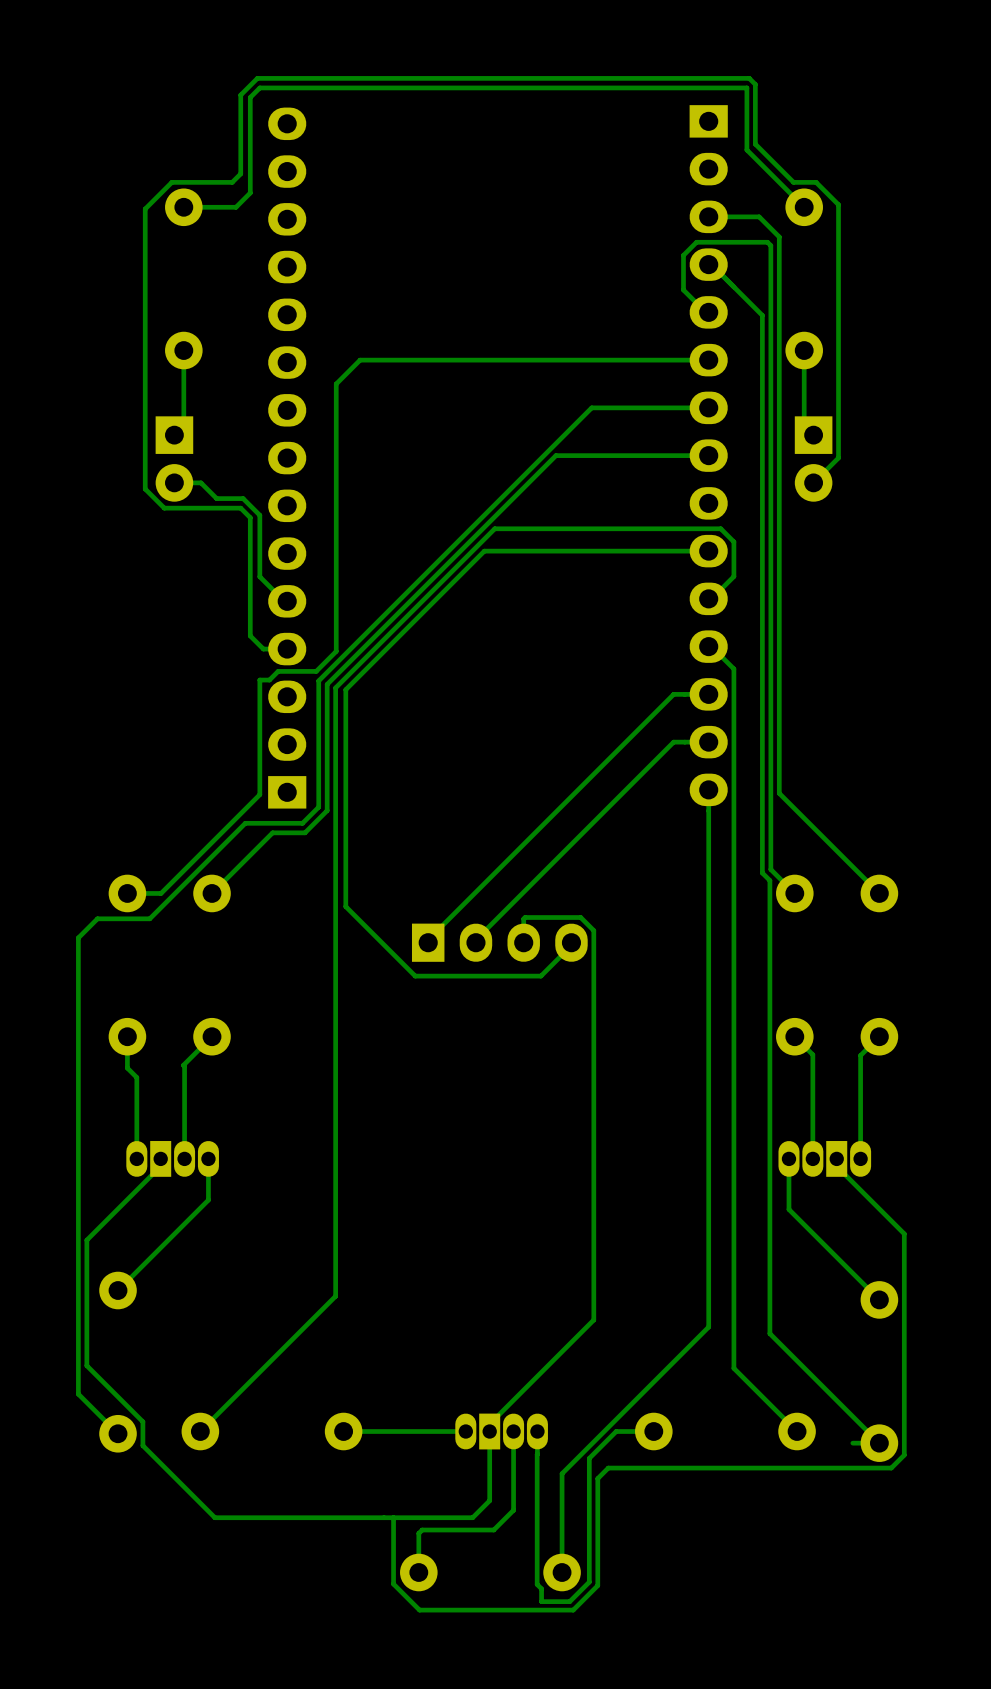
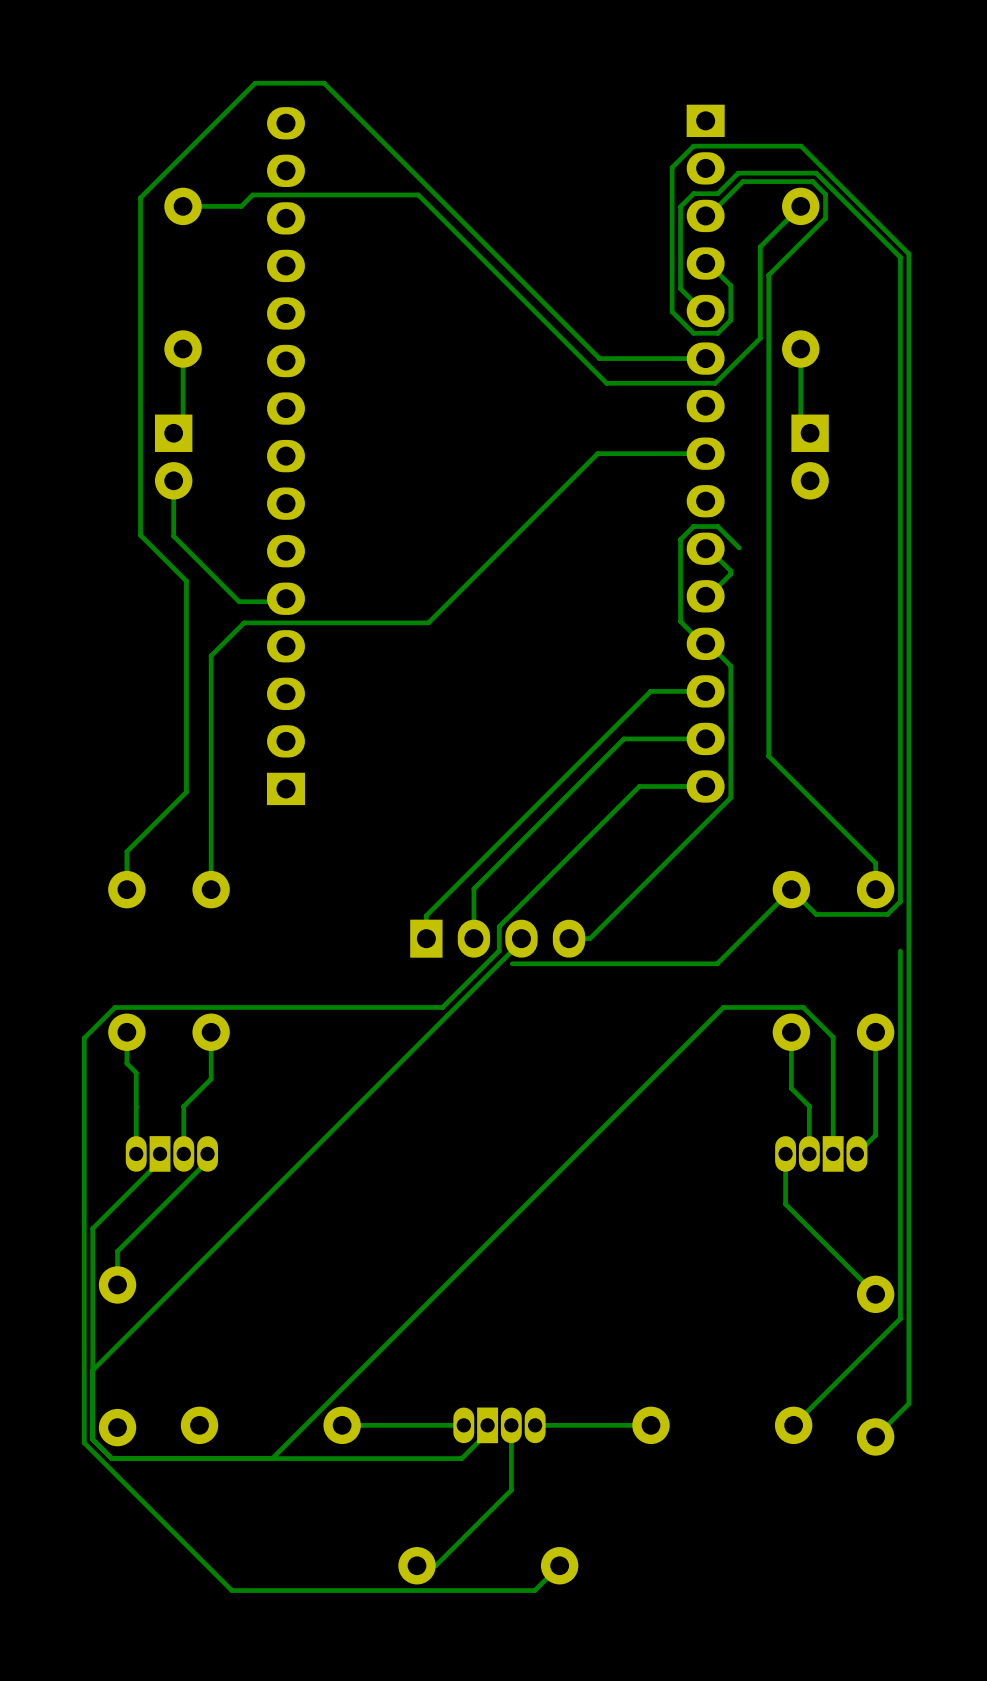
track: (793, 182) (755, 144) (755, 84) (749, 78) (257, 78) (240, 95) (240, 173) (232, 182) (171, 182) (145, 209) (145, 489) (164, 508) (240, 508) (250, 517) (250, 635) (263, 649) (287, 649) -> (790, 181) (742, 181) (708, 215)
track: (829, 195) (838, 204) (838, 457) (813, 482) -> none
track: (804, 207) (746, 149) (746, 87) (259, 87) (250, 97) (250, 192) (236, 207) -> (800, 206) (760, 246) (760, 338) (715, 383) (606, 383) (418, 194) (252, 194) (241, 206) (234, 206)
track: (711, 216) (759, 216) (779, 236) (779, 793) (879, 893) -> (825, 194) (825, 218) (768, 275) (768, 756) (875, 863) (875, 889)
track: (683, 255) (696, 242) (767, 242) (770, 245) (770, 869) (794, 893) -> (680, 254) (680, 206) (693, 193) (717, 193) (738, 173) (816, 173) (900, 257) (900, 901) (887, 914) (816, 914) (791, 889) (717, 963) (512, 963)
track: (733, 286) (762, 315) (762, 873) (769, 880) (769, 1333) (879, 1443) (852, 1443) -> (730, 285) (730, 320) (717, 333) (693, 333) (672, 311) (672, 167) (693, 146) (801, 146) (908, 253) (908, 1403) (875, 1436)
track: (602, 360) (360, 360) (336, 384) (336, 651) (316, 671) (278, 671) (269, 680) (259, 680) (259, 794) (161, 893) (127, 893) -> (599, 358) (324, 83) (255, 83) (140, 197) (140, 535) (186, 581) (186, 792) (126, 851) (126, 889)
track: (708, 407) (591, 407) (318, 680) (318, 807) (302, 823) (245, 823) (149, 918) (97, 918) (78, 937) (78, 1394) (118, 1433) -> none
track: (600, 455) (555, 455) (327, 684) (327, 810) (304, 832) (272, 832) (212, 893) -> (597, 453) (428, 622) (244, 622) (211, 655) (211, 889)
track: (174, 482) (201, 482) (216, 498) (243, 498) (259, 515) (259, 576) (284, 601) (287, 601) -> (173, 480) (173, 536) (239, 601) (282, 601)
track: (696, 528) (494, 528) (335, 687) (335, 1296) (200, 1431) -> (693, 526) (680, 539) (680, 621) (702, 643)
track: (733, 541) (733, 573) -> (708, 548) (730, 571)
track: none -> (730, 539) (739, 547)
track: (708, 551) (484, 551) (345, 689) (345, 906) (415, 976) (540, 976) (571, 945) (571, 942) -> (730, 797) (589, 938) (569, 938)
track: (673, 694) (428, 939) -> (670, 691) (650, 691) (426, 915) (426, 935)
track: (673, 742) (475, 939) -> (670, 738) (623, 738) (473, 888) (473, 935)
track: (708, 789) (708, 1327) (562, 1473) (562, 1572) -> (705, 786) (639, 786) (499, 926) (499, 950) (442, 1007) (114, 1007) (84, 1038) (84, 1442) (231, 1590) (534, 1590) (559, 1565)
track: (733, 801) (733, 1368) (797, 1431) -> none
track: (523, 942) (525, 917) (580, 917) (593, 930) (593, 1319) (489, 1424) (489, 1431) -> none
track: none -> (521, 941) (92, 1370)
track: (212, 1036) (183, 1065) (184, 1111) -> (211, 1032) (211, 1079) (183, 1106)
track: (794, 1036) (812, 1054) (812, 1111) -> (791, 1032) (791, 1088) (809, 1106)
track: (879, 1036) (860, 1055) (860, 1158) -> (875, 1032) (875, 1135) (856, 1153)
track: (836, 1158) (836, 1166) (904, 1233) -> (900, 951) (900, 1228)
track: none -> (833, 1153) (833, 1037) (803, 1007) (723, 1007) (272, 1458)
track: (208, 1166) (208, 1200) (118, 1290) -> (207, 1161) (117, 1251) (117, 1284)
track: (93, 1233) (86, 1240) (86, 1365) (142, 1421) (142, 1445) (214, 1517) (472, 1517) (489, 1500) (489, 1438) -> (92, 1228) (92, 1439) (111, 1458) (461, 1458) (487, 1432)
track: (904, 1324) (904, 1455) (891, 1468) (608, 1468) (597, 1478) (597, 1585) (573, 1610) (419, 1610) (393, 1584) (393, 1517) -> (900, 1318) (793, 1425)
track: (616, 1431) (589, 1458) (589, 1582) (569, 1601) (541, 1601) (541, 1588) (537, 1584) (537, 1431) -> (613, 1425) (535, 1425)
track: (513, 1496) (513, 1510) (493, 1530) (422, 1530) (418, 1533) (418, 1572) -> (511, 1490) (435, 1565) (417, 1565)

